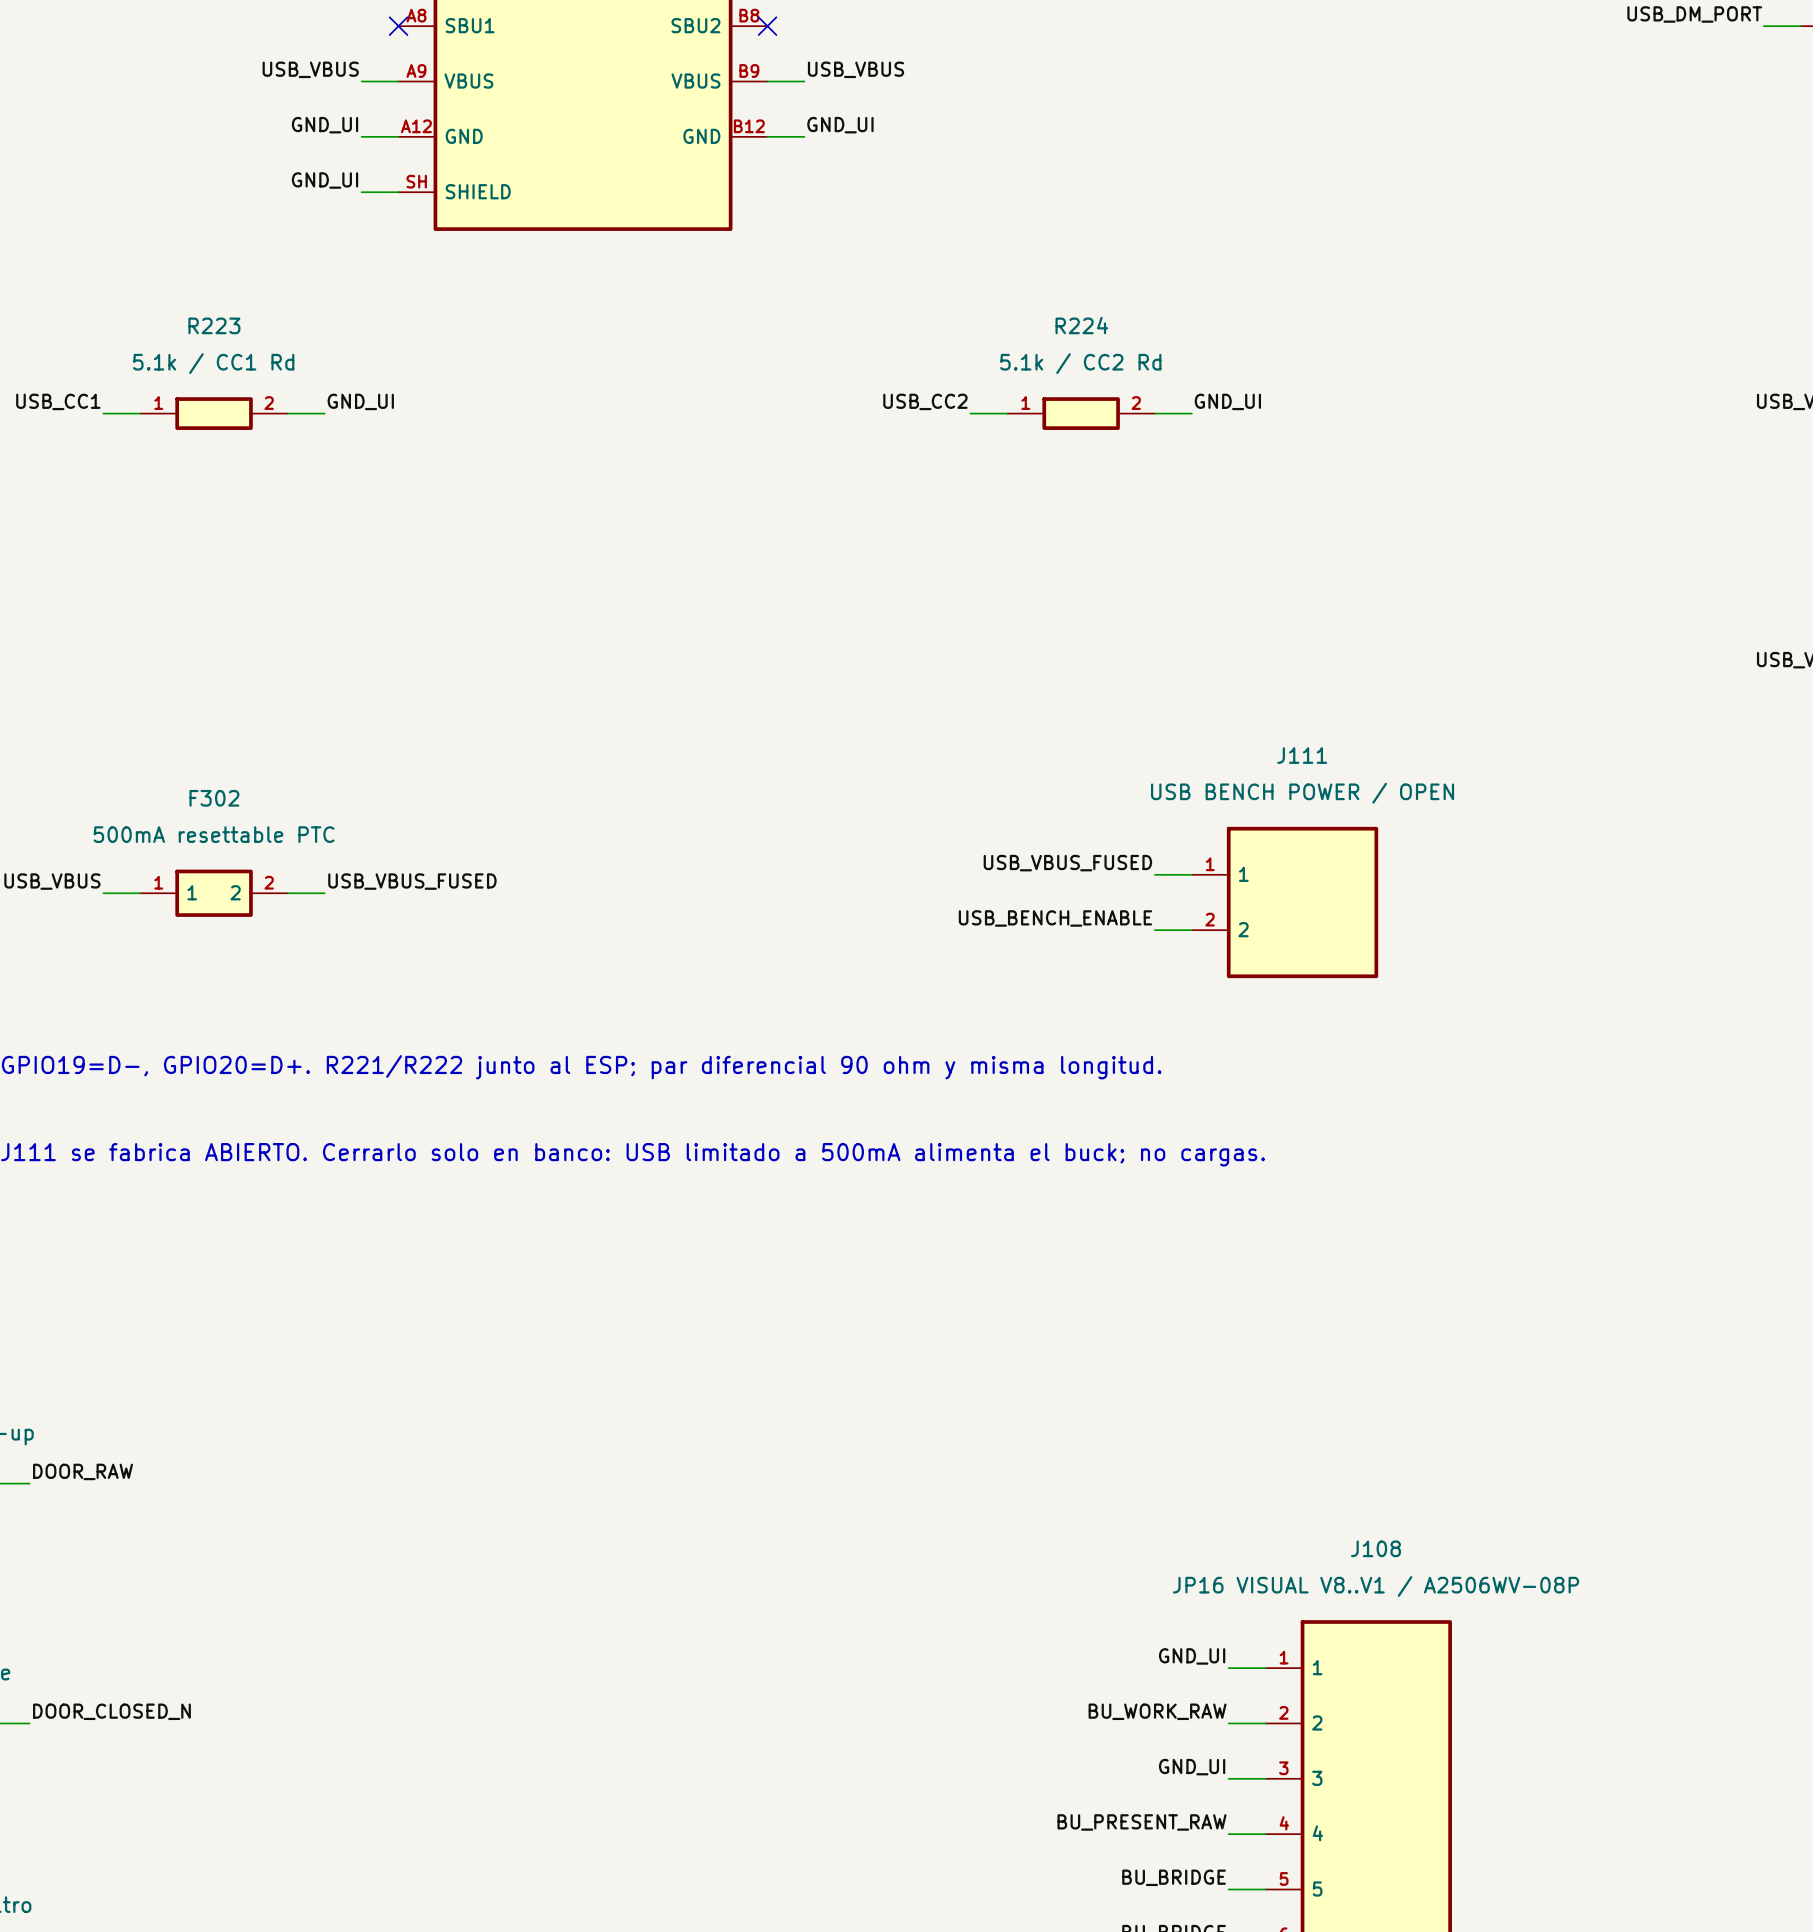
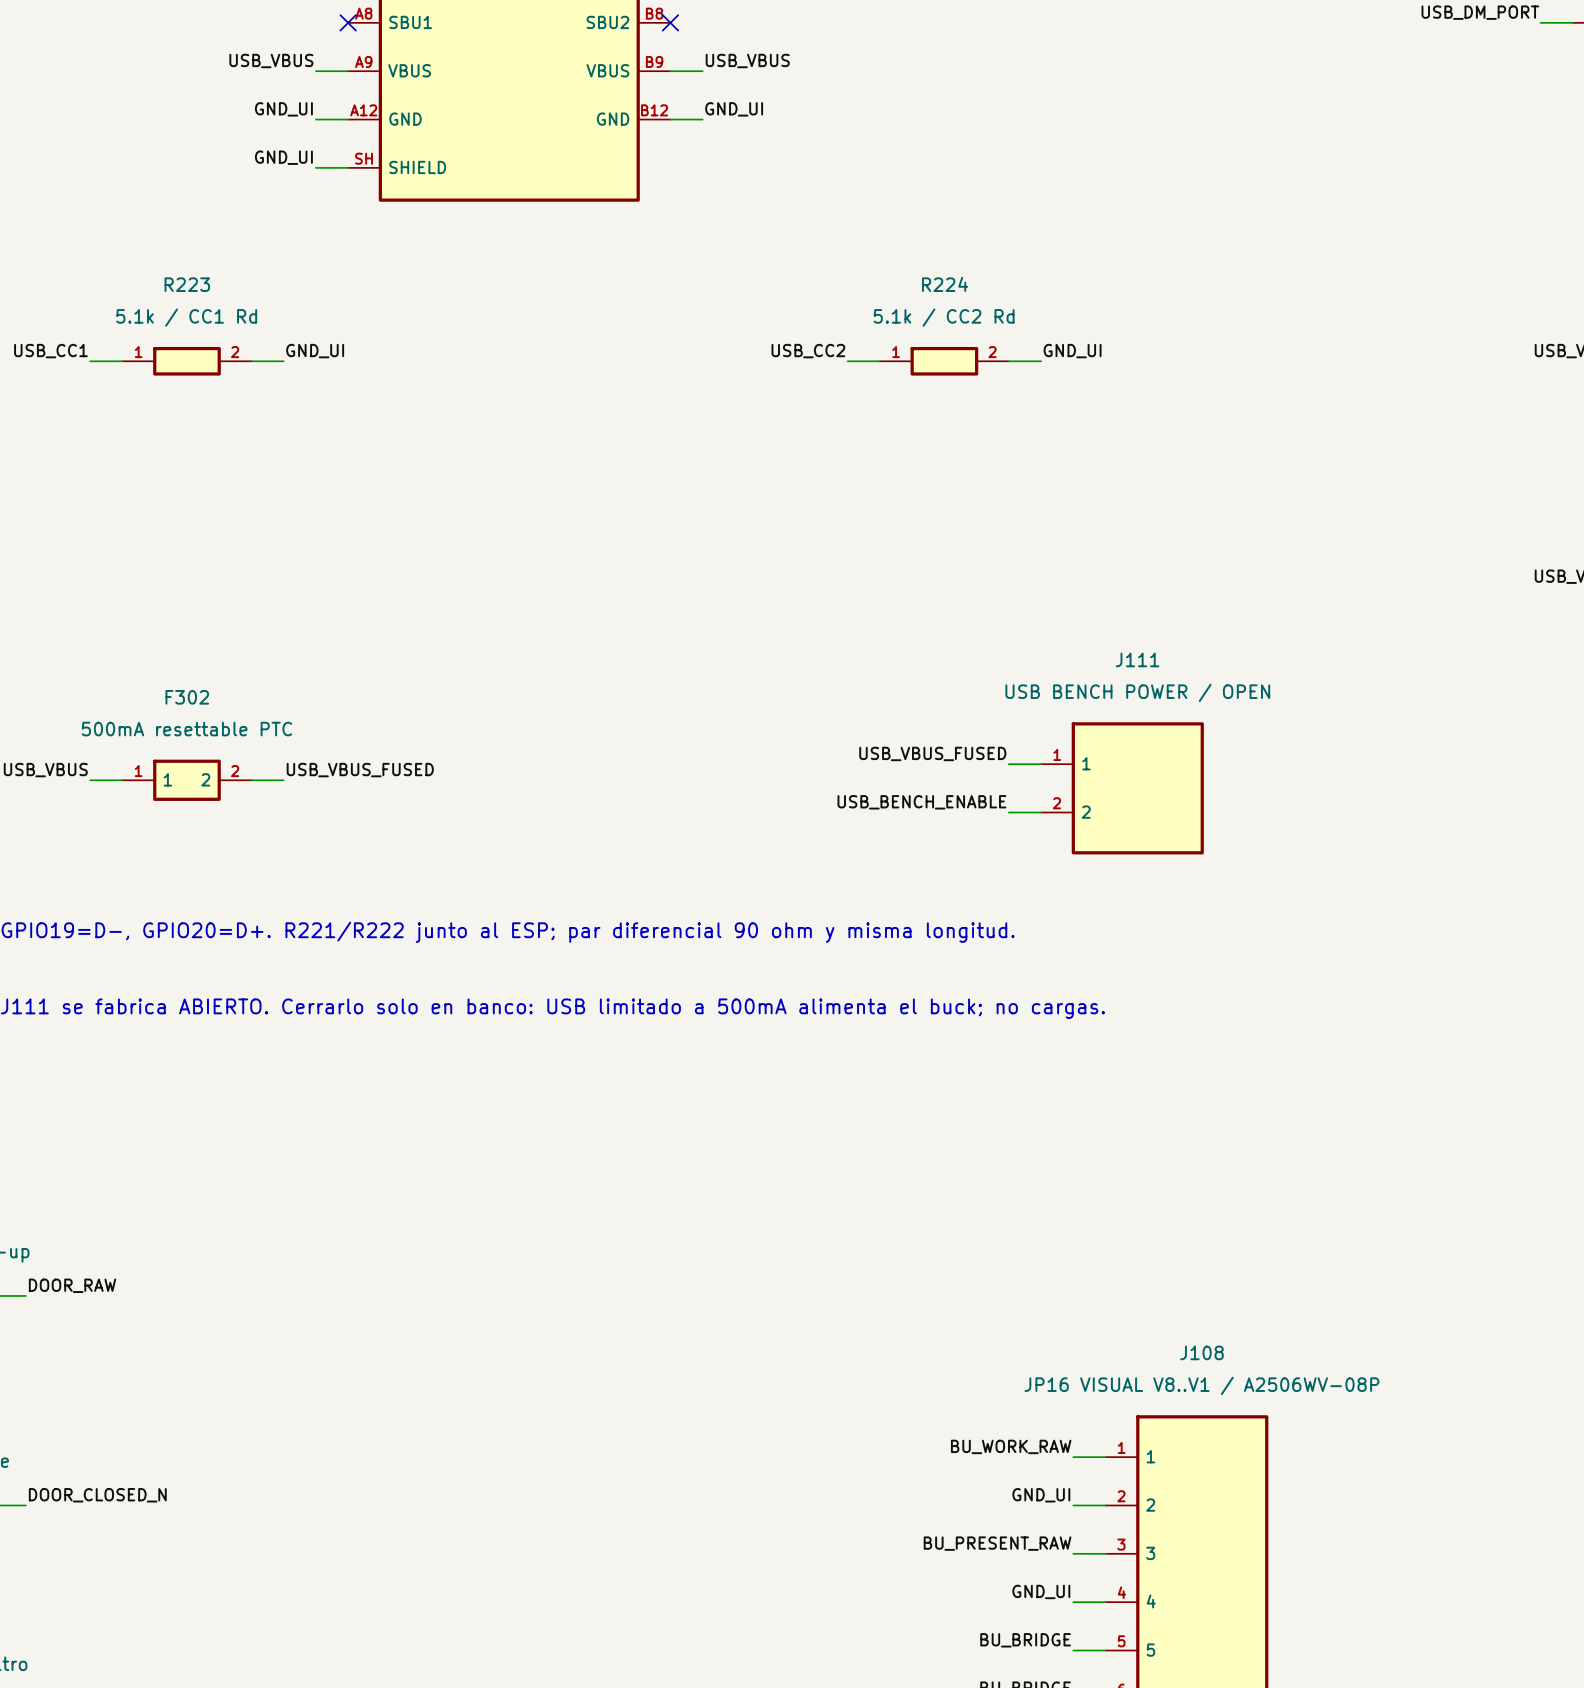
label: GND_UI (1192, 1656) -> BU_WORK_RAW (1011, 1446)
label: BU_WORK_RAW (1157, 1711) -> GND_UI (1041, 1495)
label: GND_UI (1192, 1767) -> BU_PRESENT_RAW (997, 1543)
label: BU_PRESENT_RAW (1141, 1822) -> GND_UI (1041, 1591)

